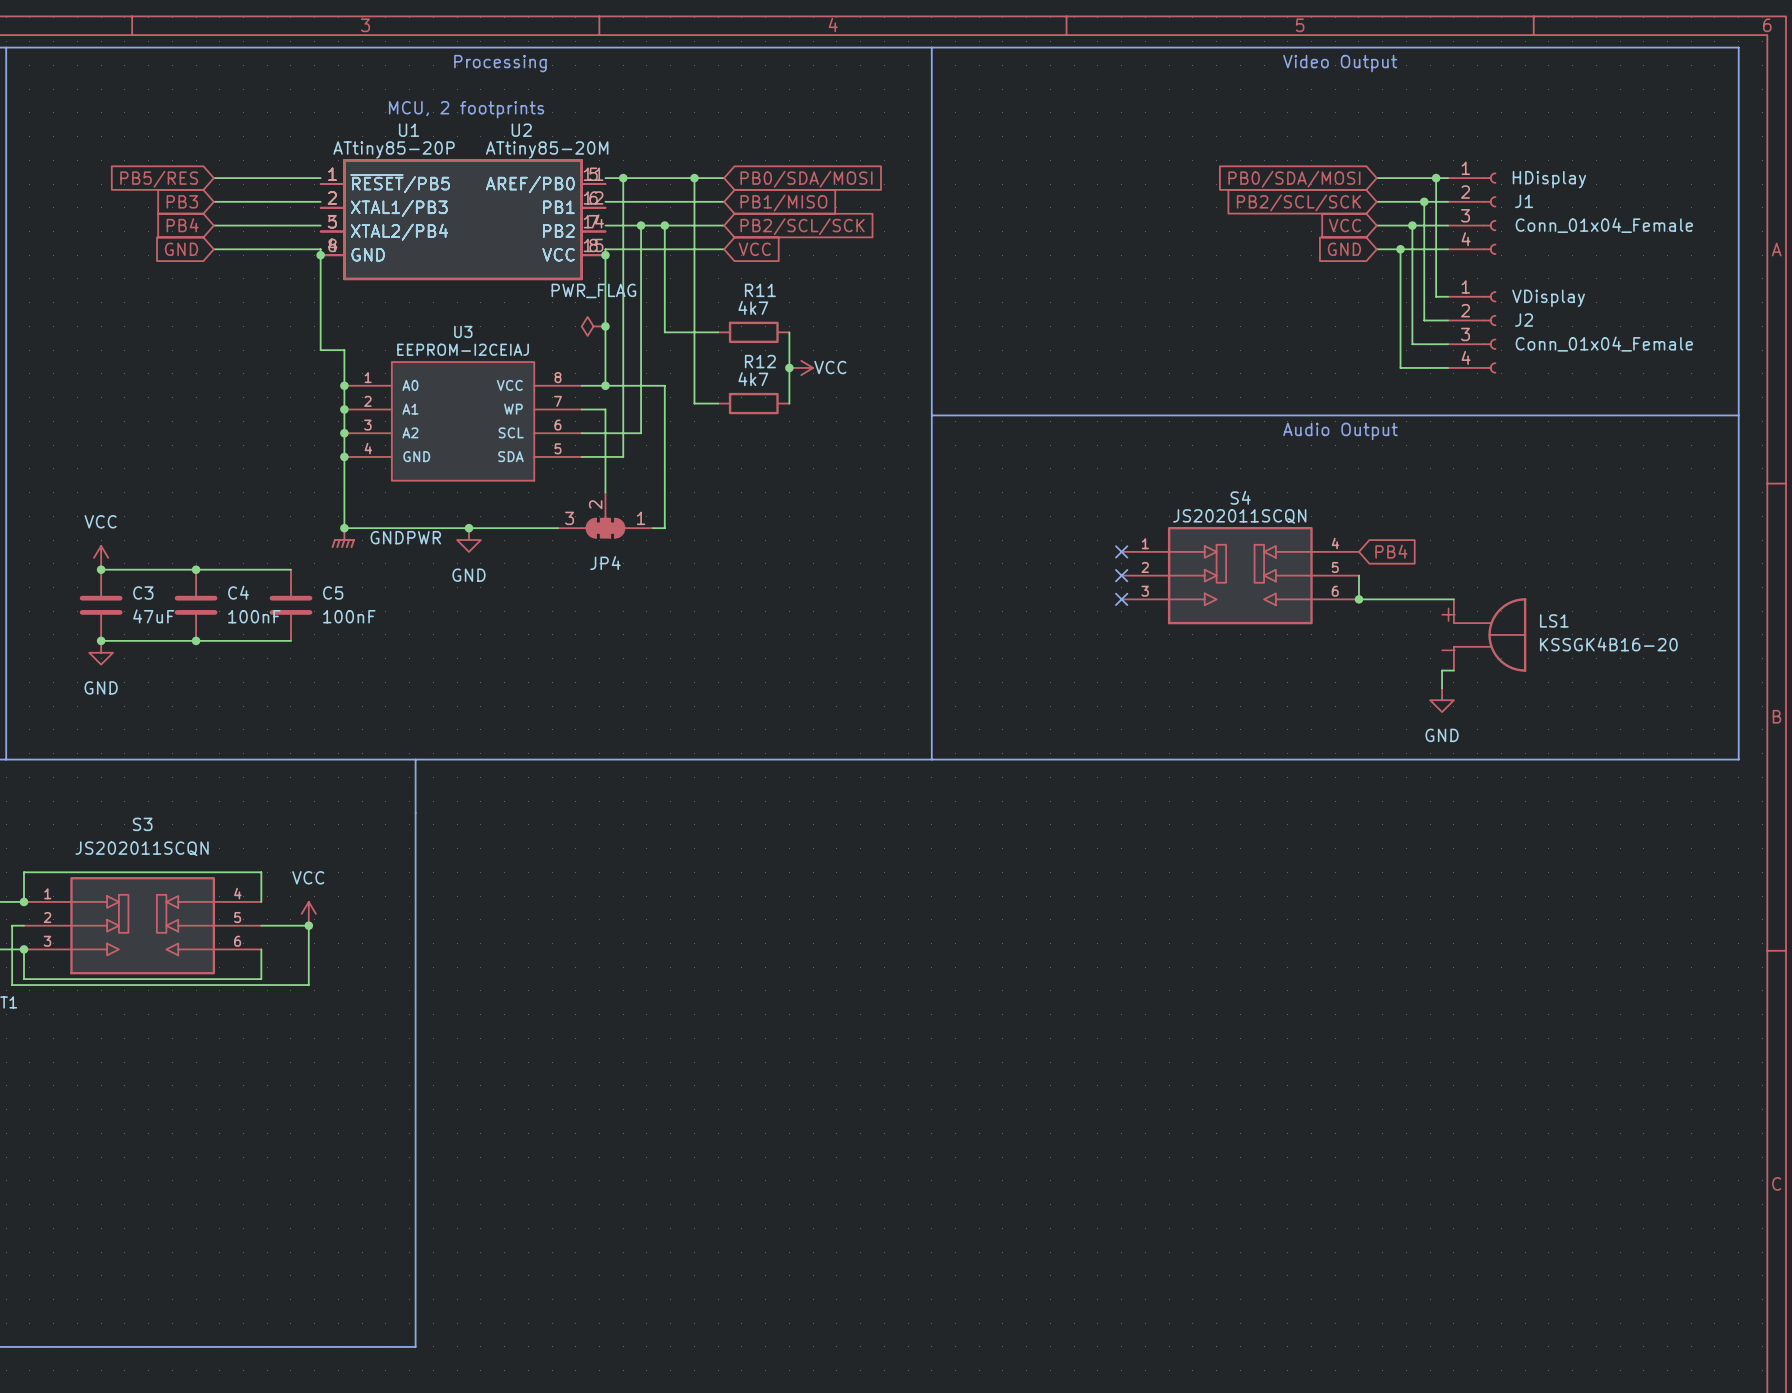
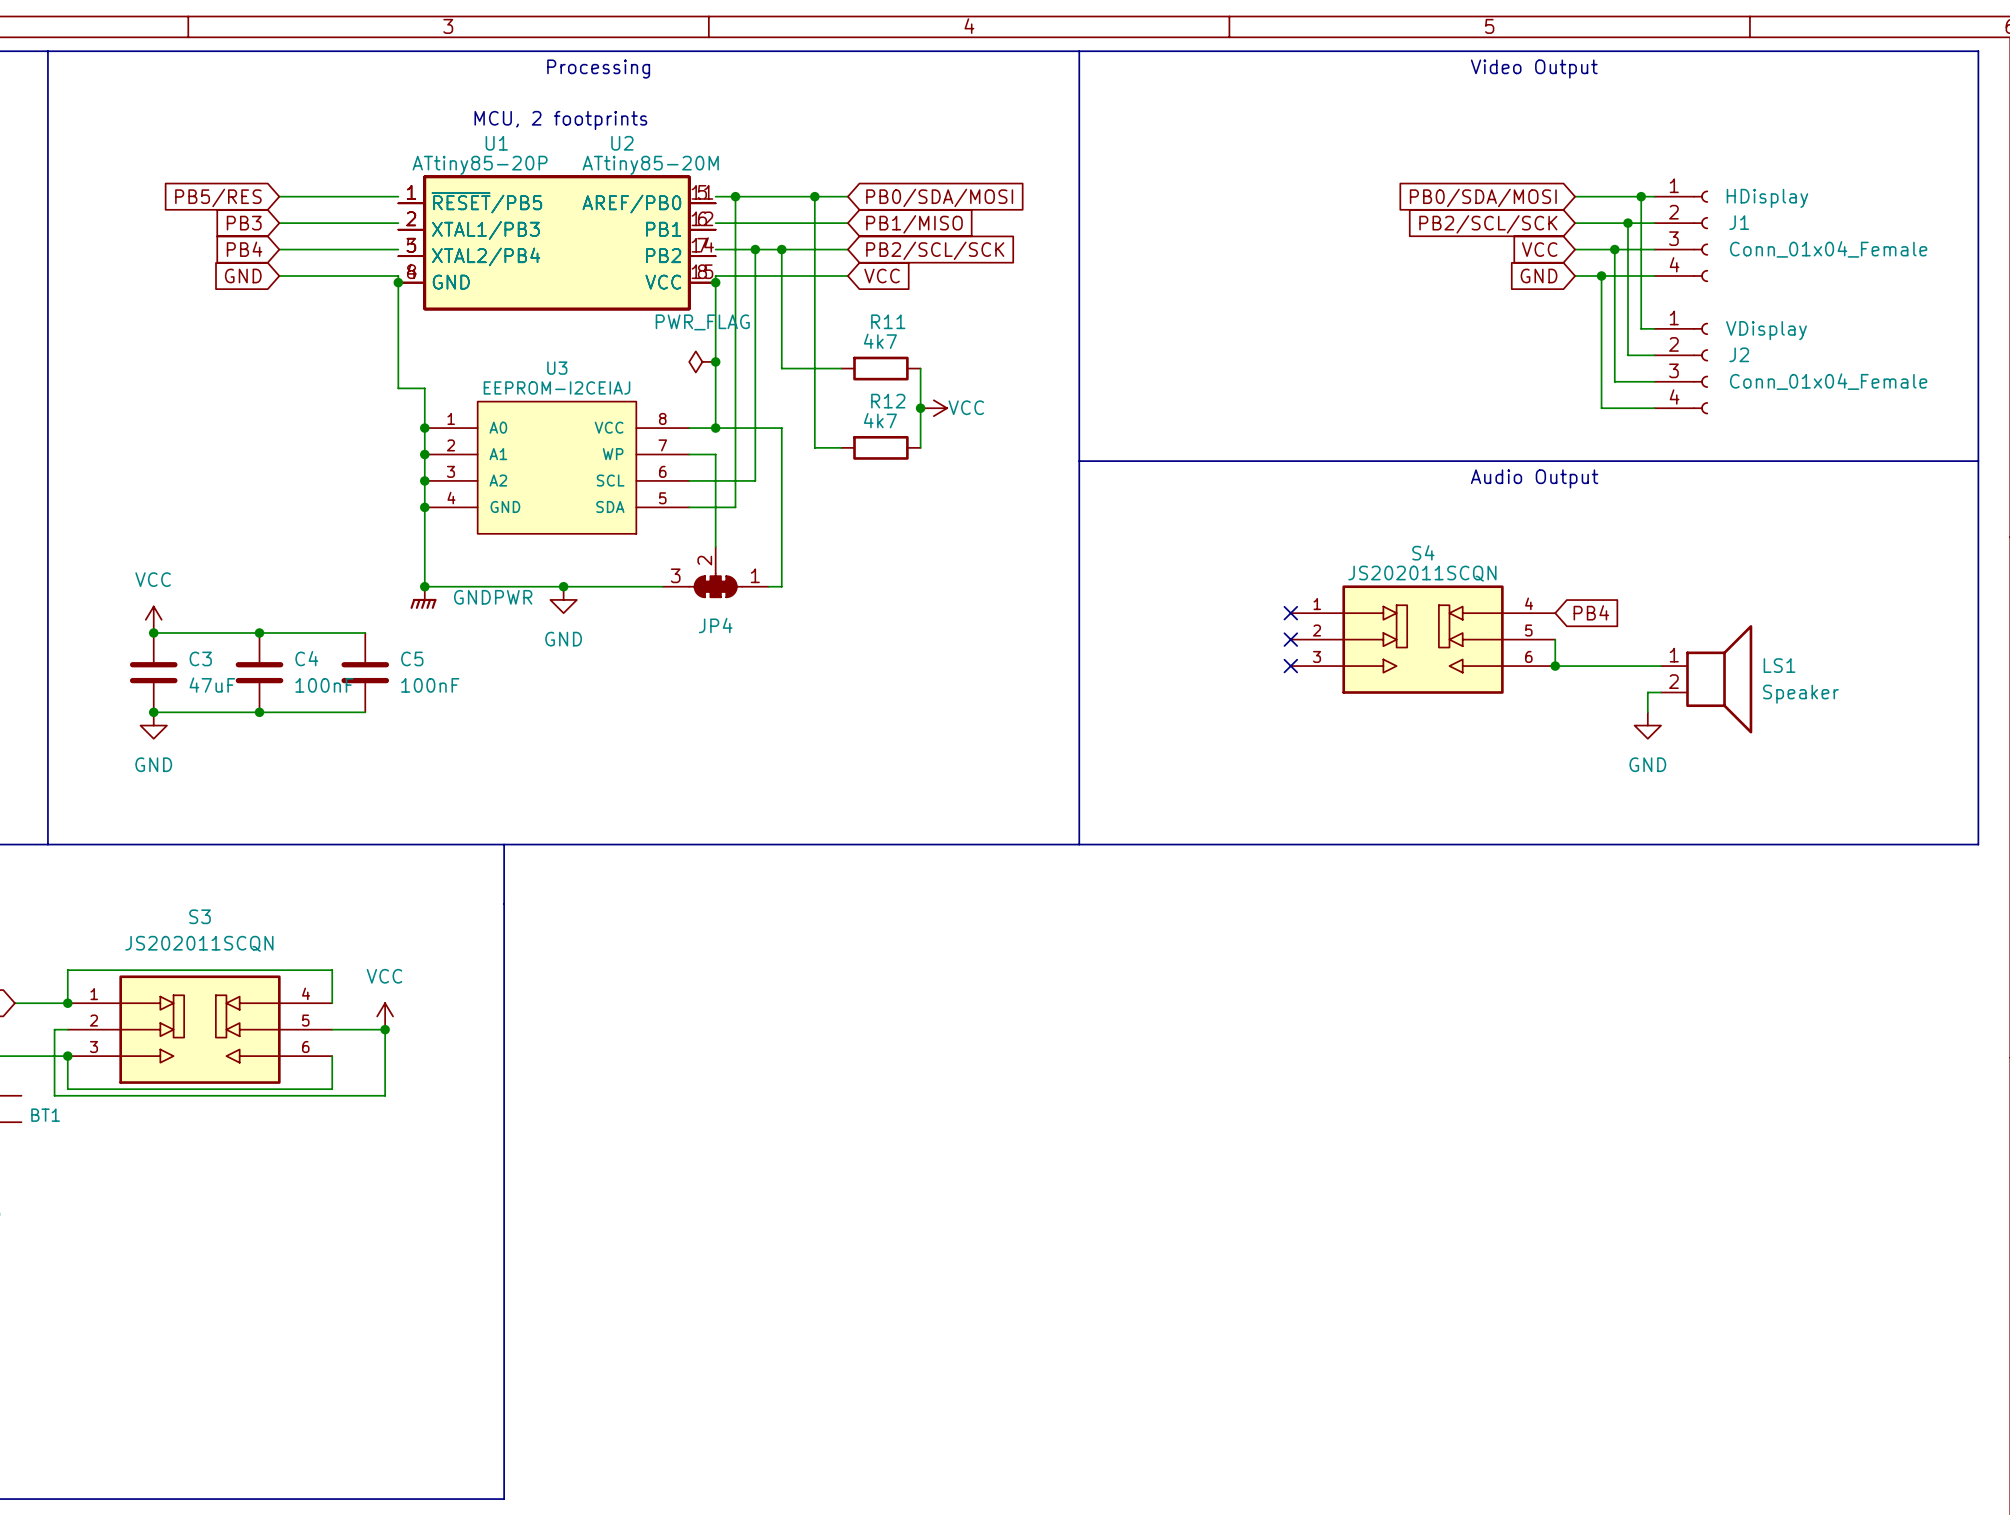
LS1 symbol: [1453, 598, 1527, 672] -> [1661, 625, 1753, 734]
LS1 value: KSSGK4B16-20 (1608, 644) -> Speaker (1800, 694)
wire: (1453, 670) (1442, 670) (1442, 688) -> (1661, 692) (1647, 692) (1647, 712)
power symbol position: GND (1442, 700) -> GND (1647, 725)

